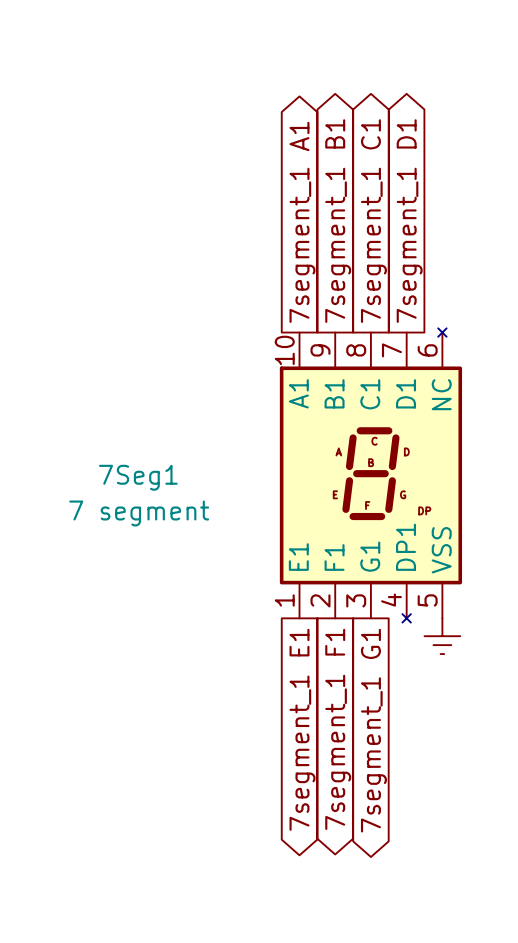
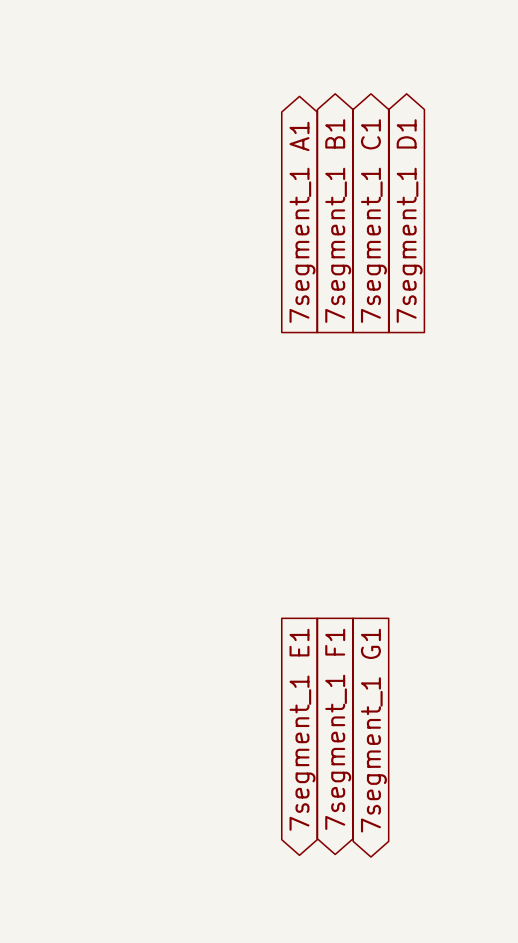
7Seg1: 7 segment (370, 475) -> none
power symbol: (442, 636) -> none

